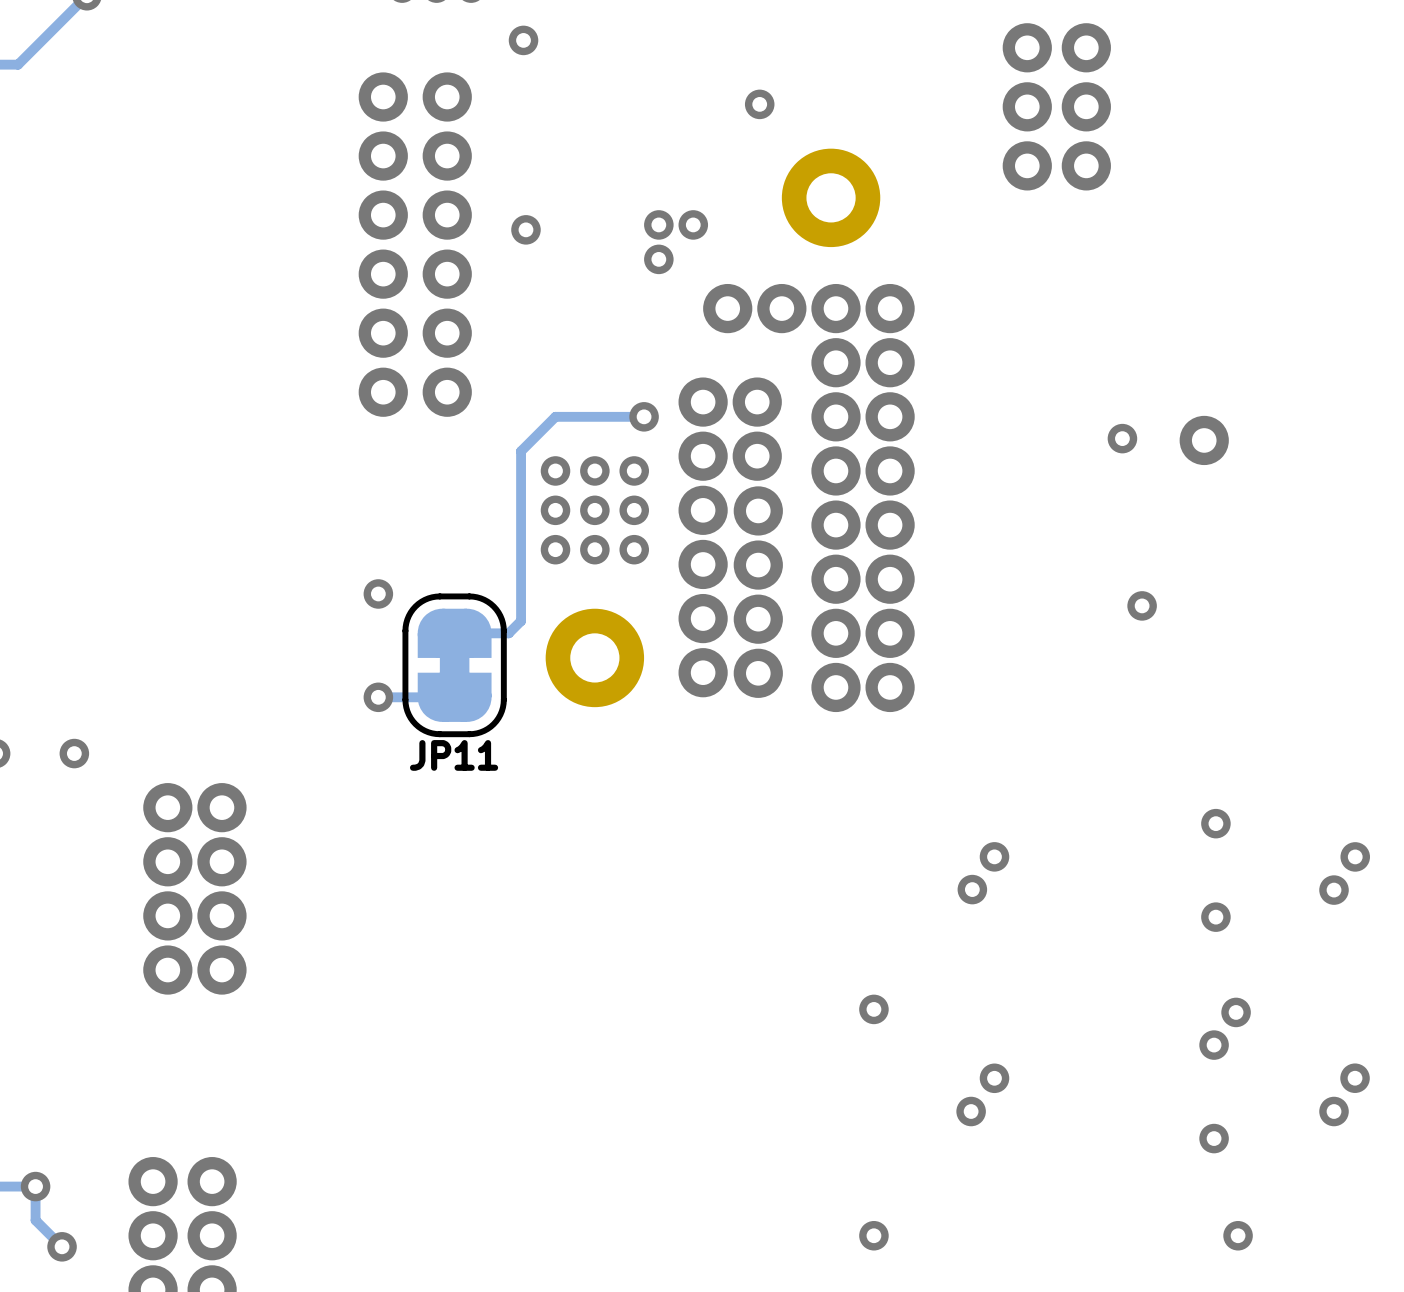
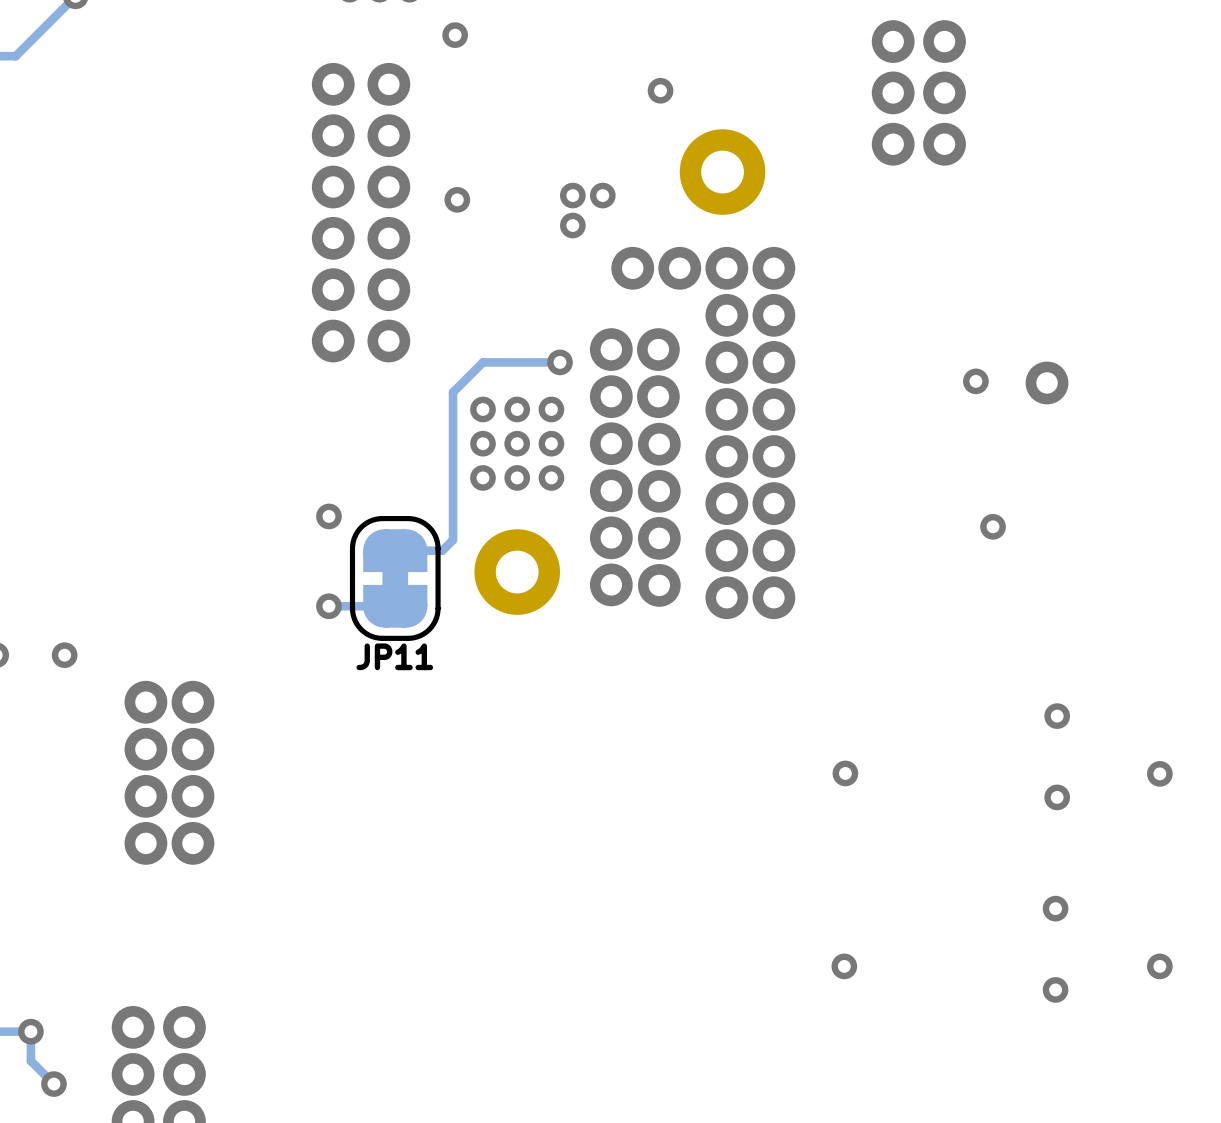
via: (994, 856) -> none
via: (1355, 856) -> none
via: (873, 1009) -> none
via: (1236, 1012) -> none
via: (994, 1078) -> none
via: (1355, 1078) -> none
via: (873, 1235) -> none
via: (1238, 1235) -> none

